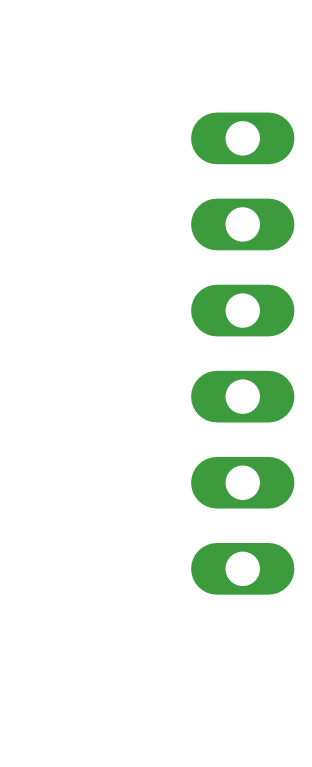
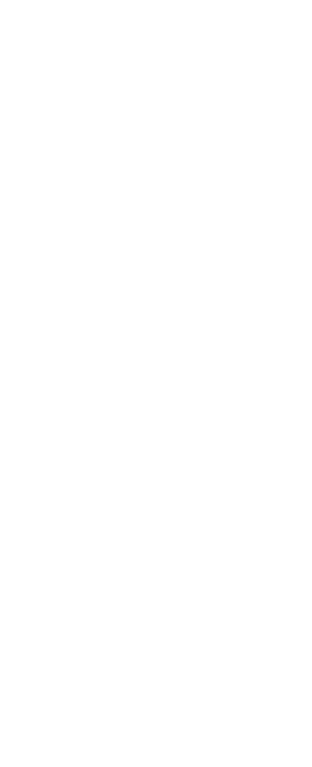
part: (242, 353) -> none

